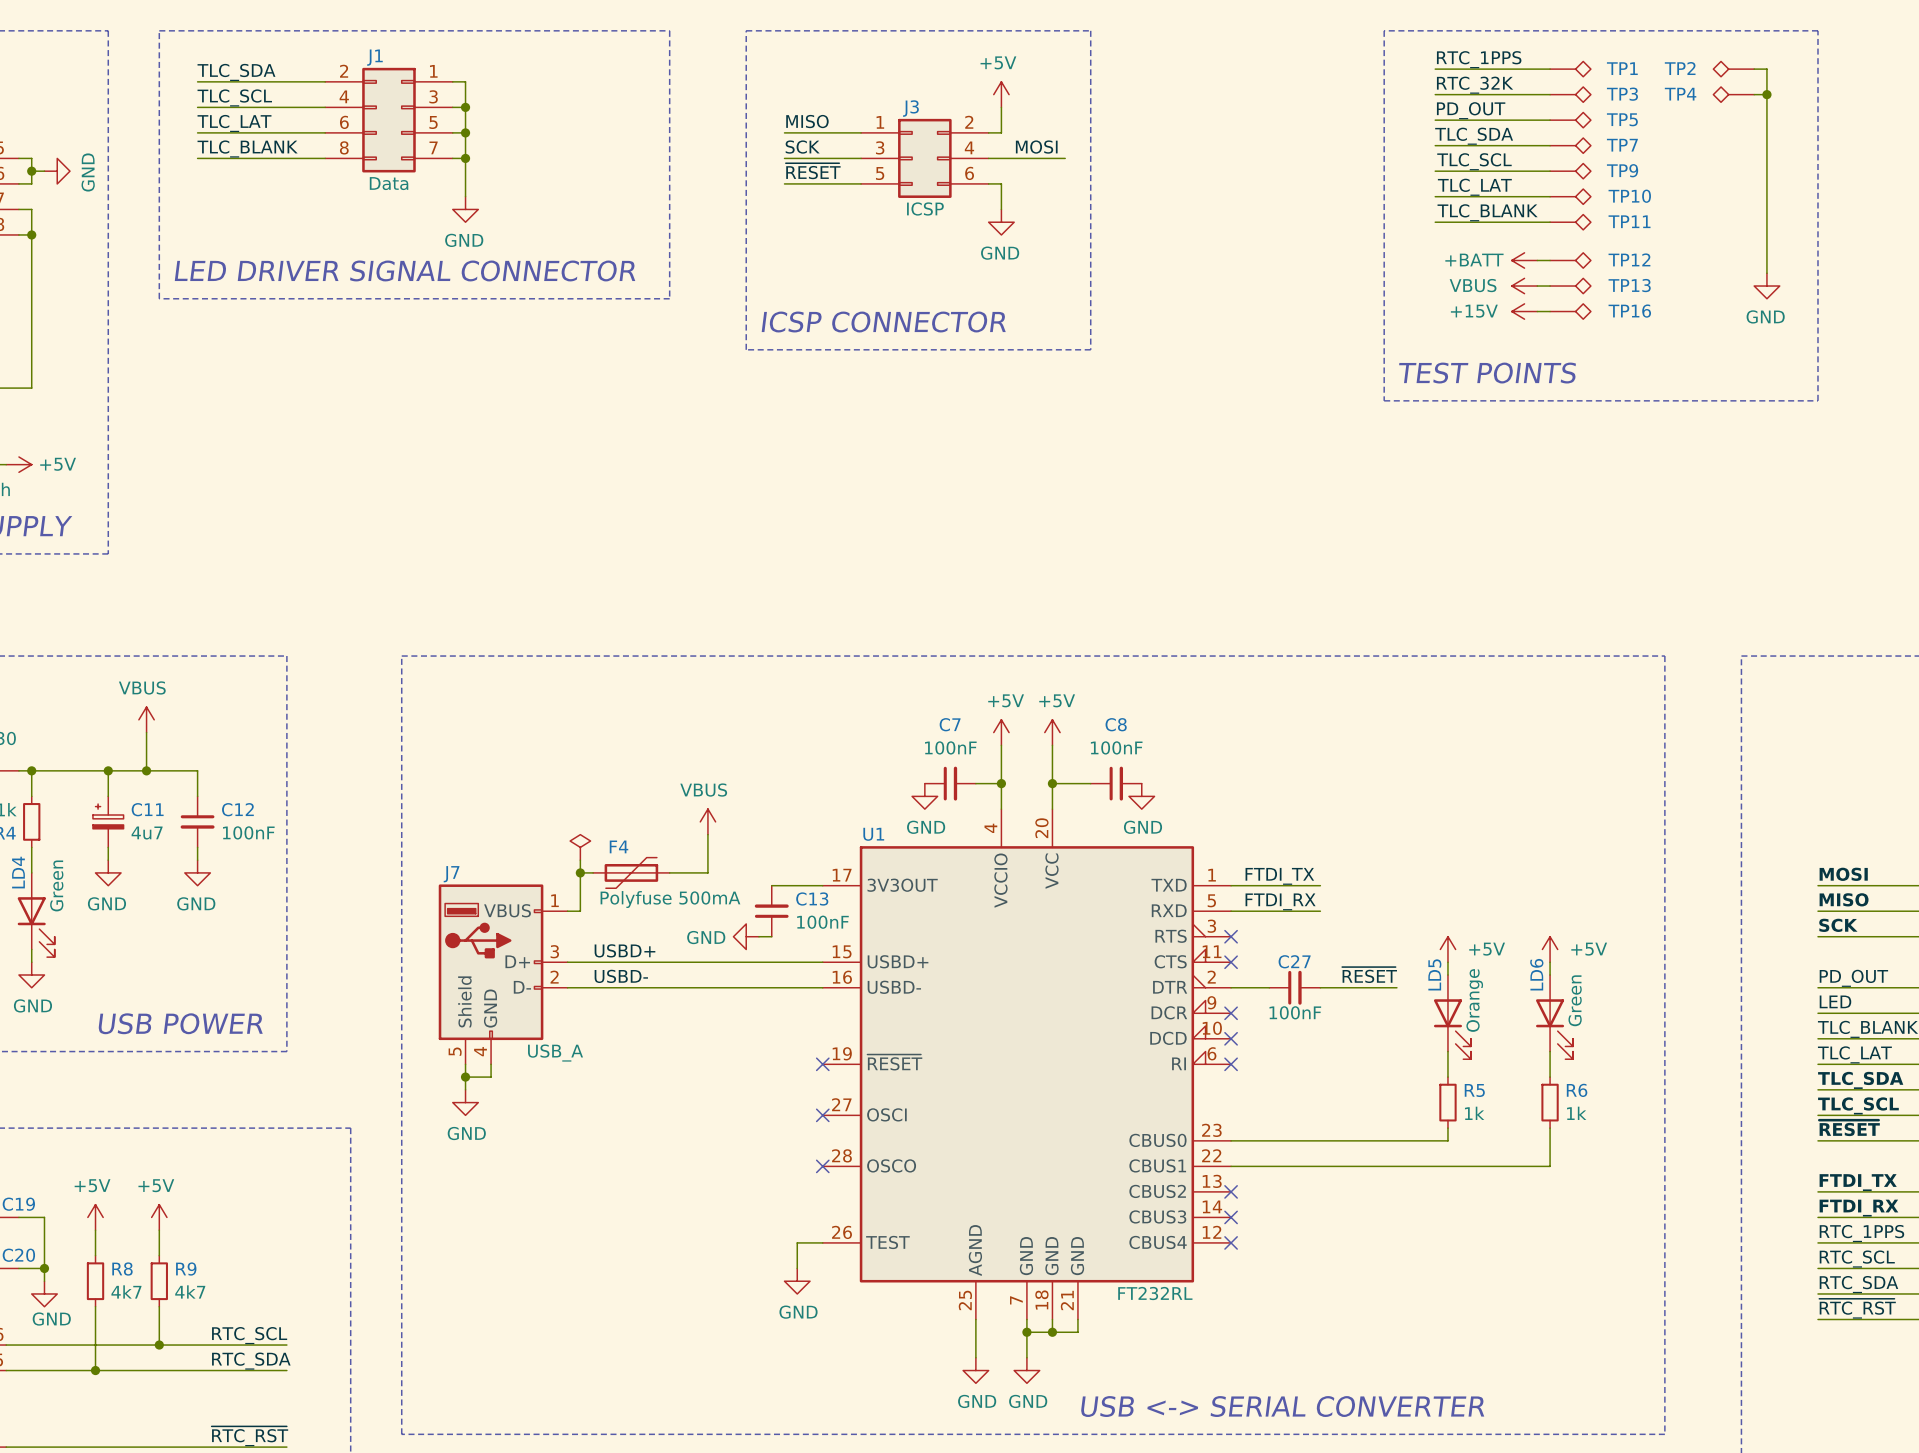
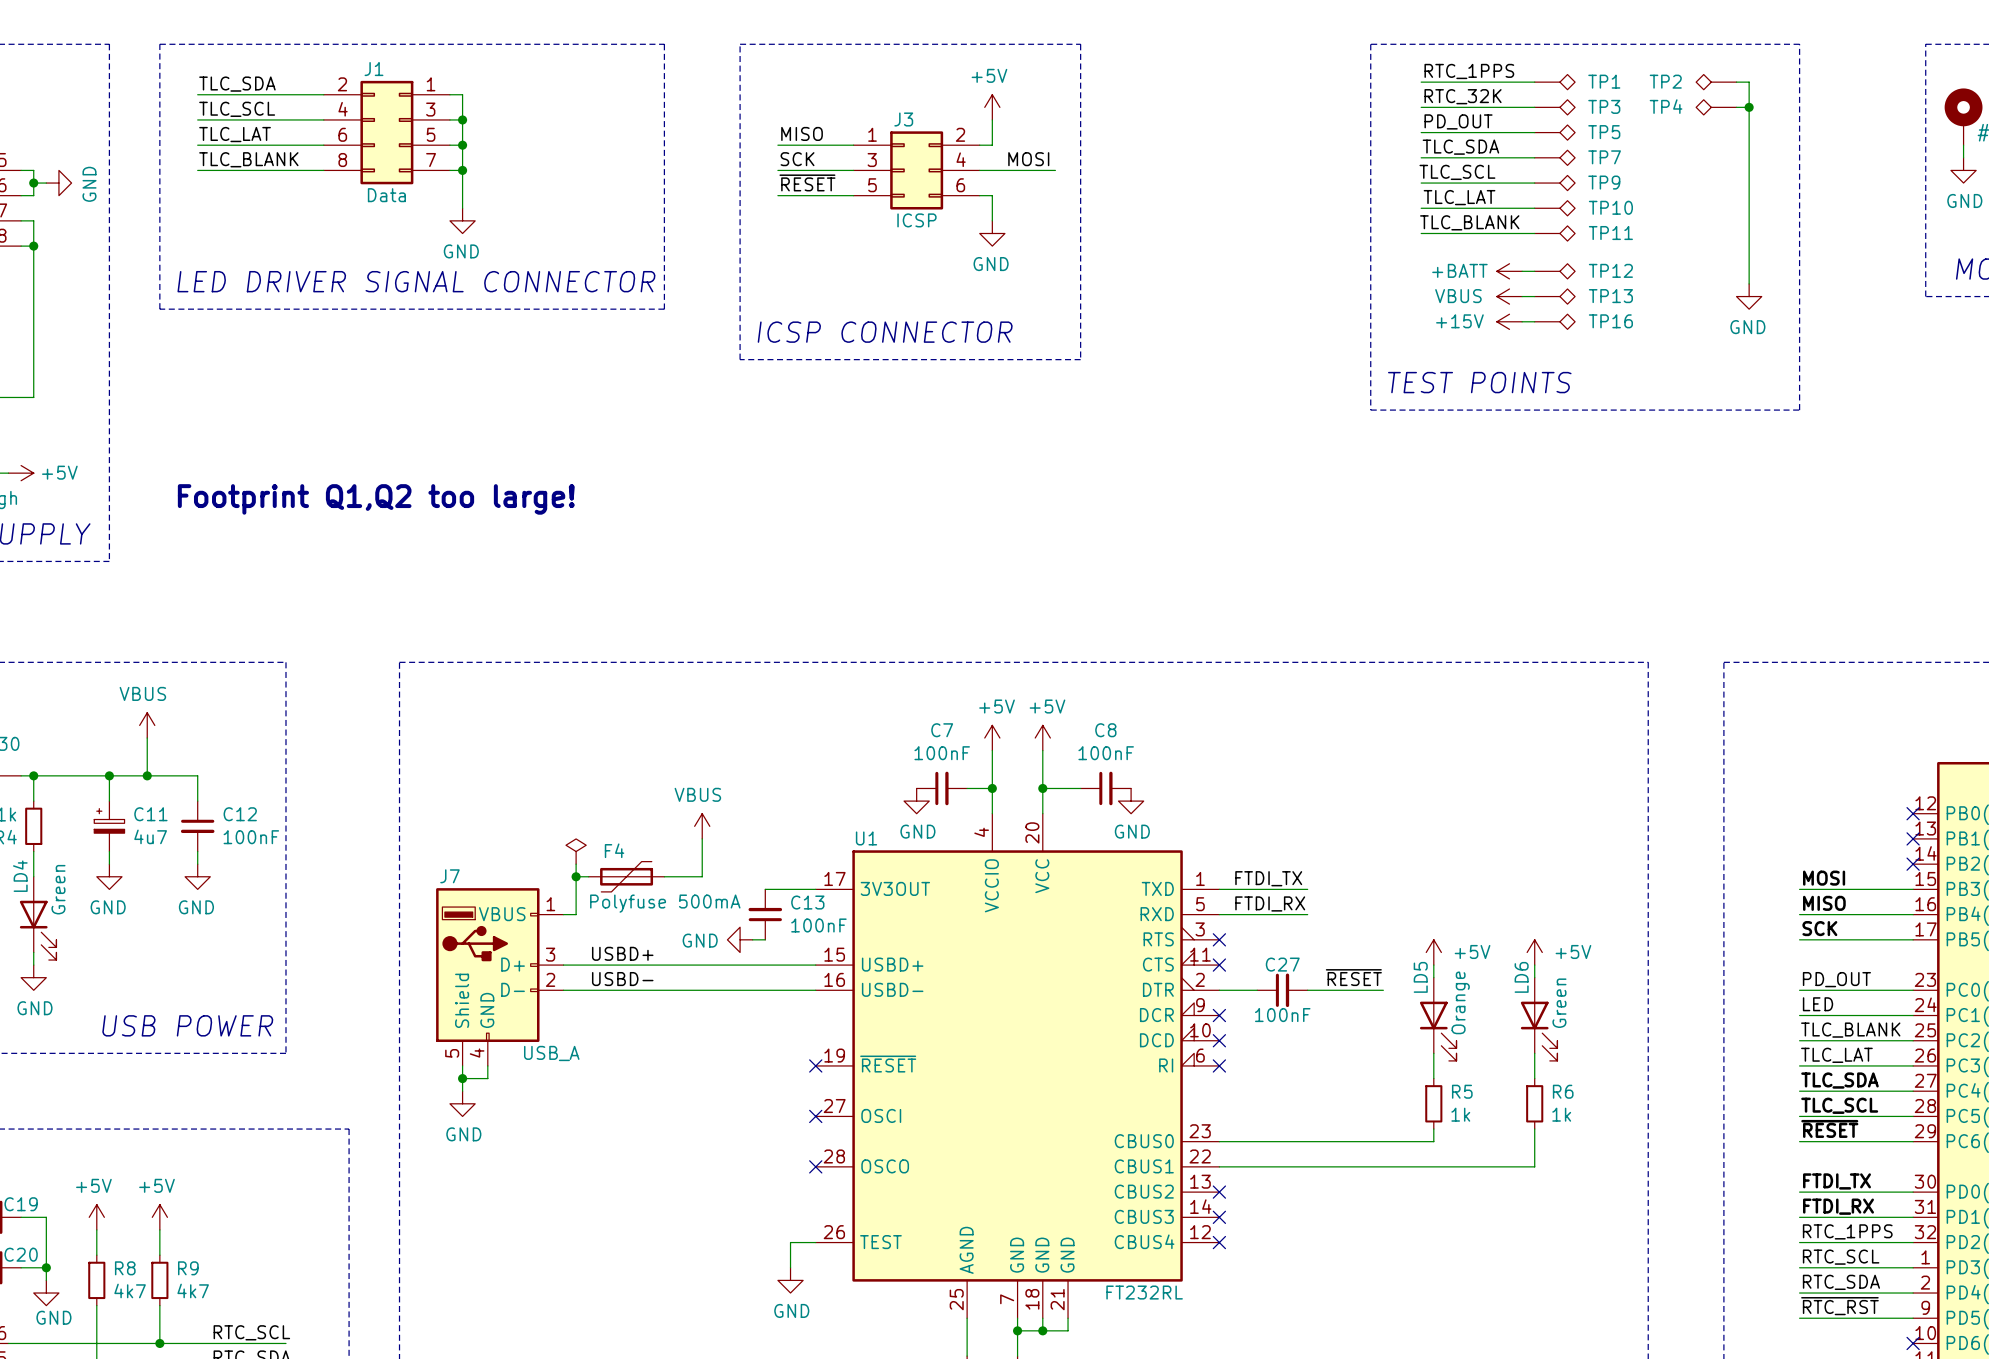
text: none -> Footprint Q1,Q2 too large! (376, 499)

